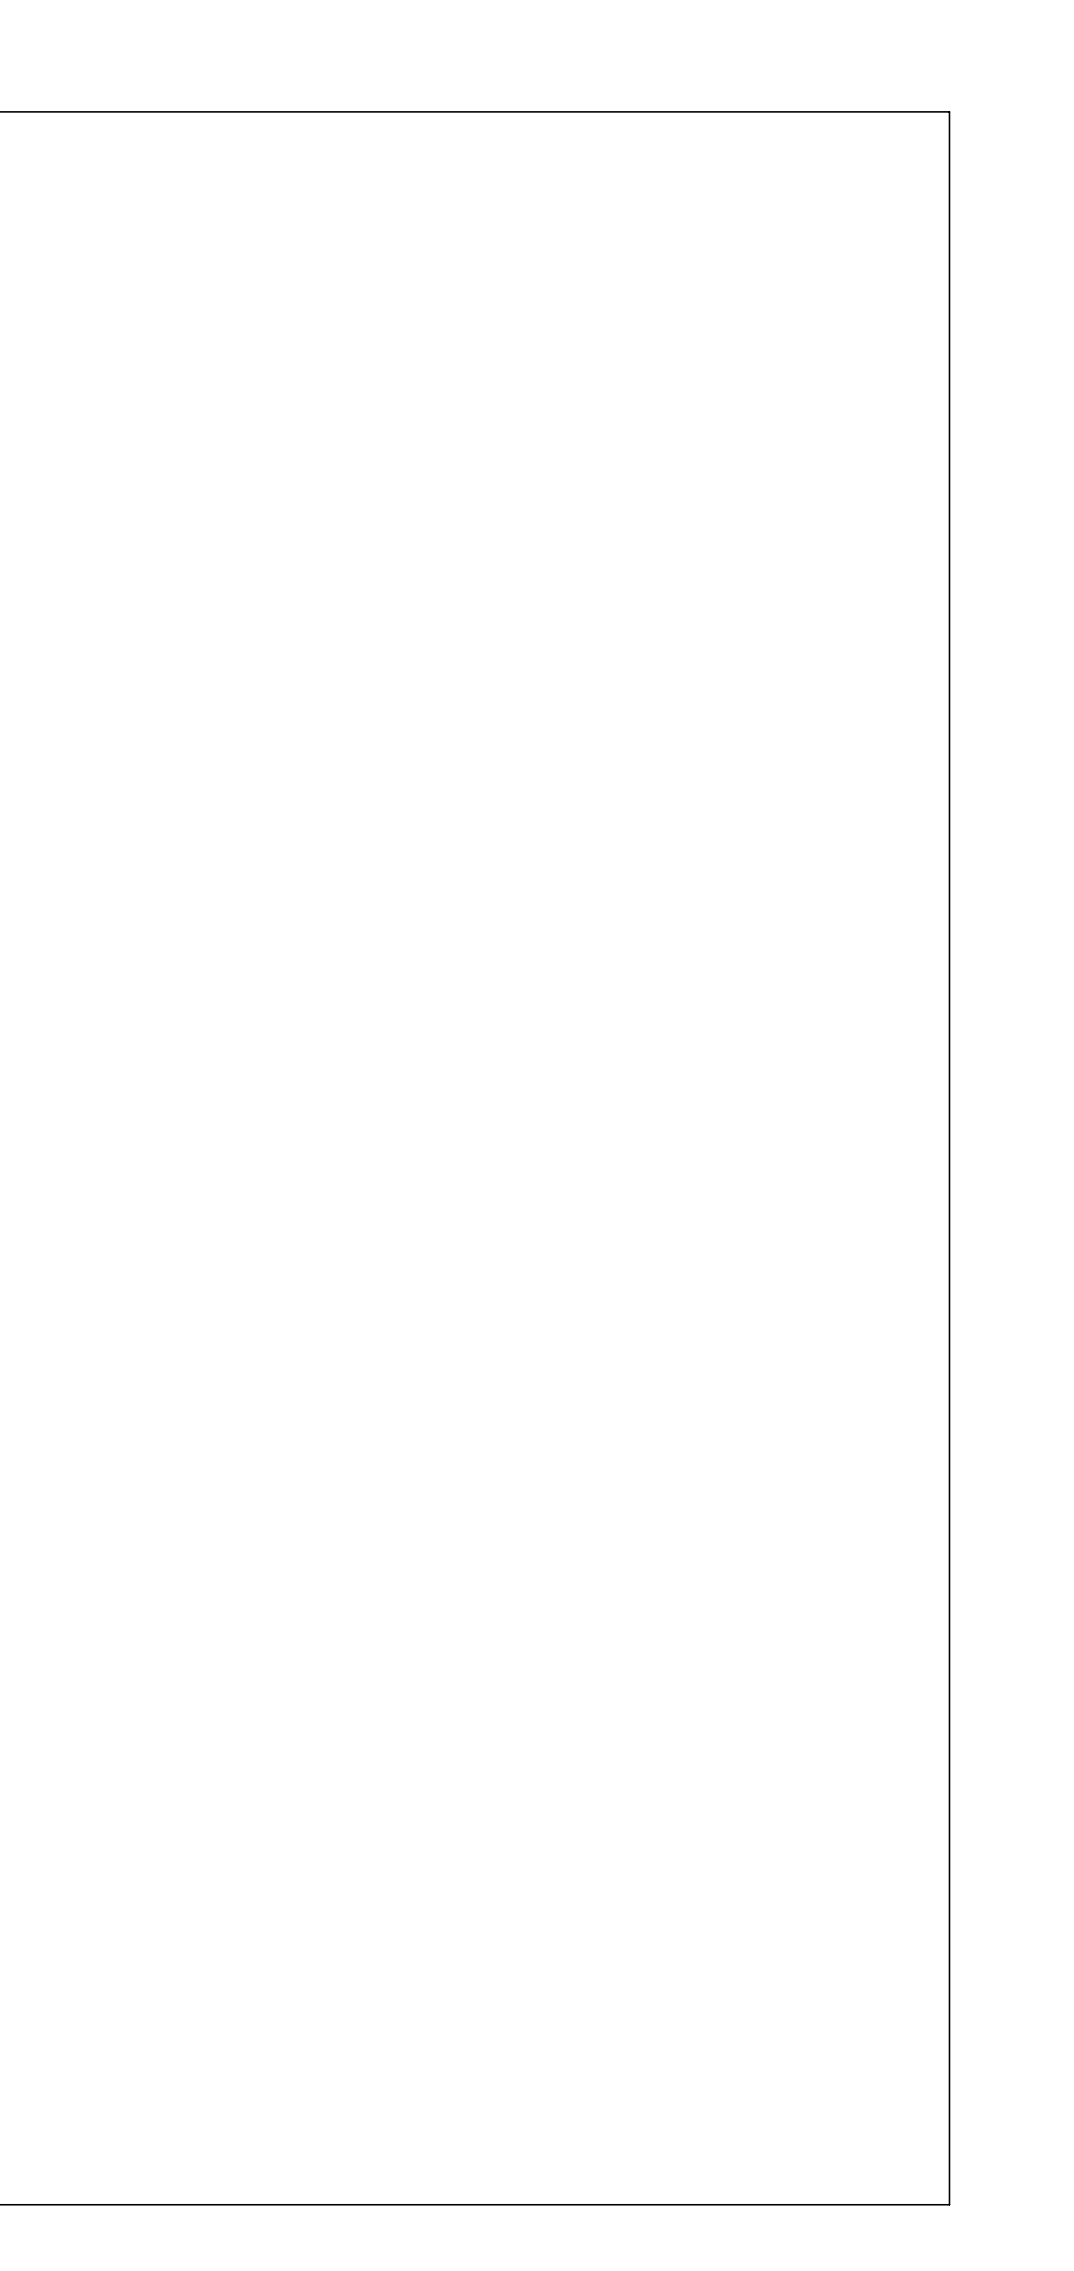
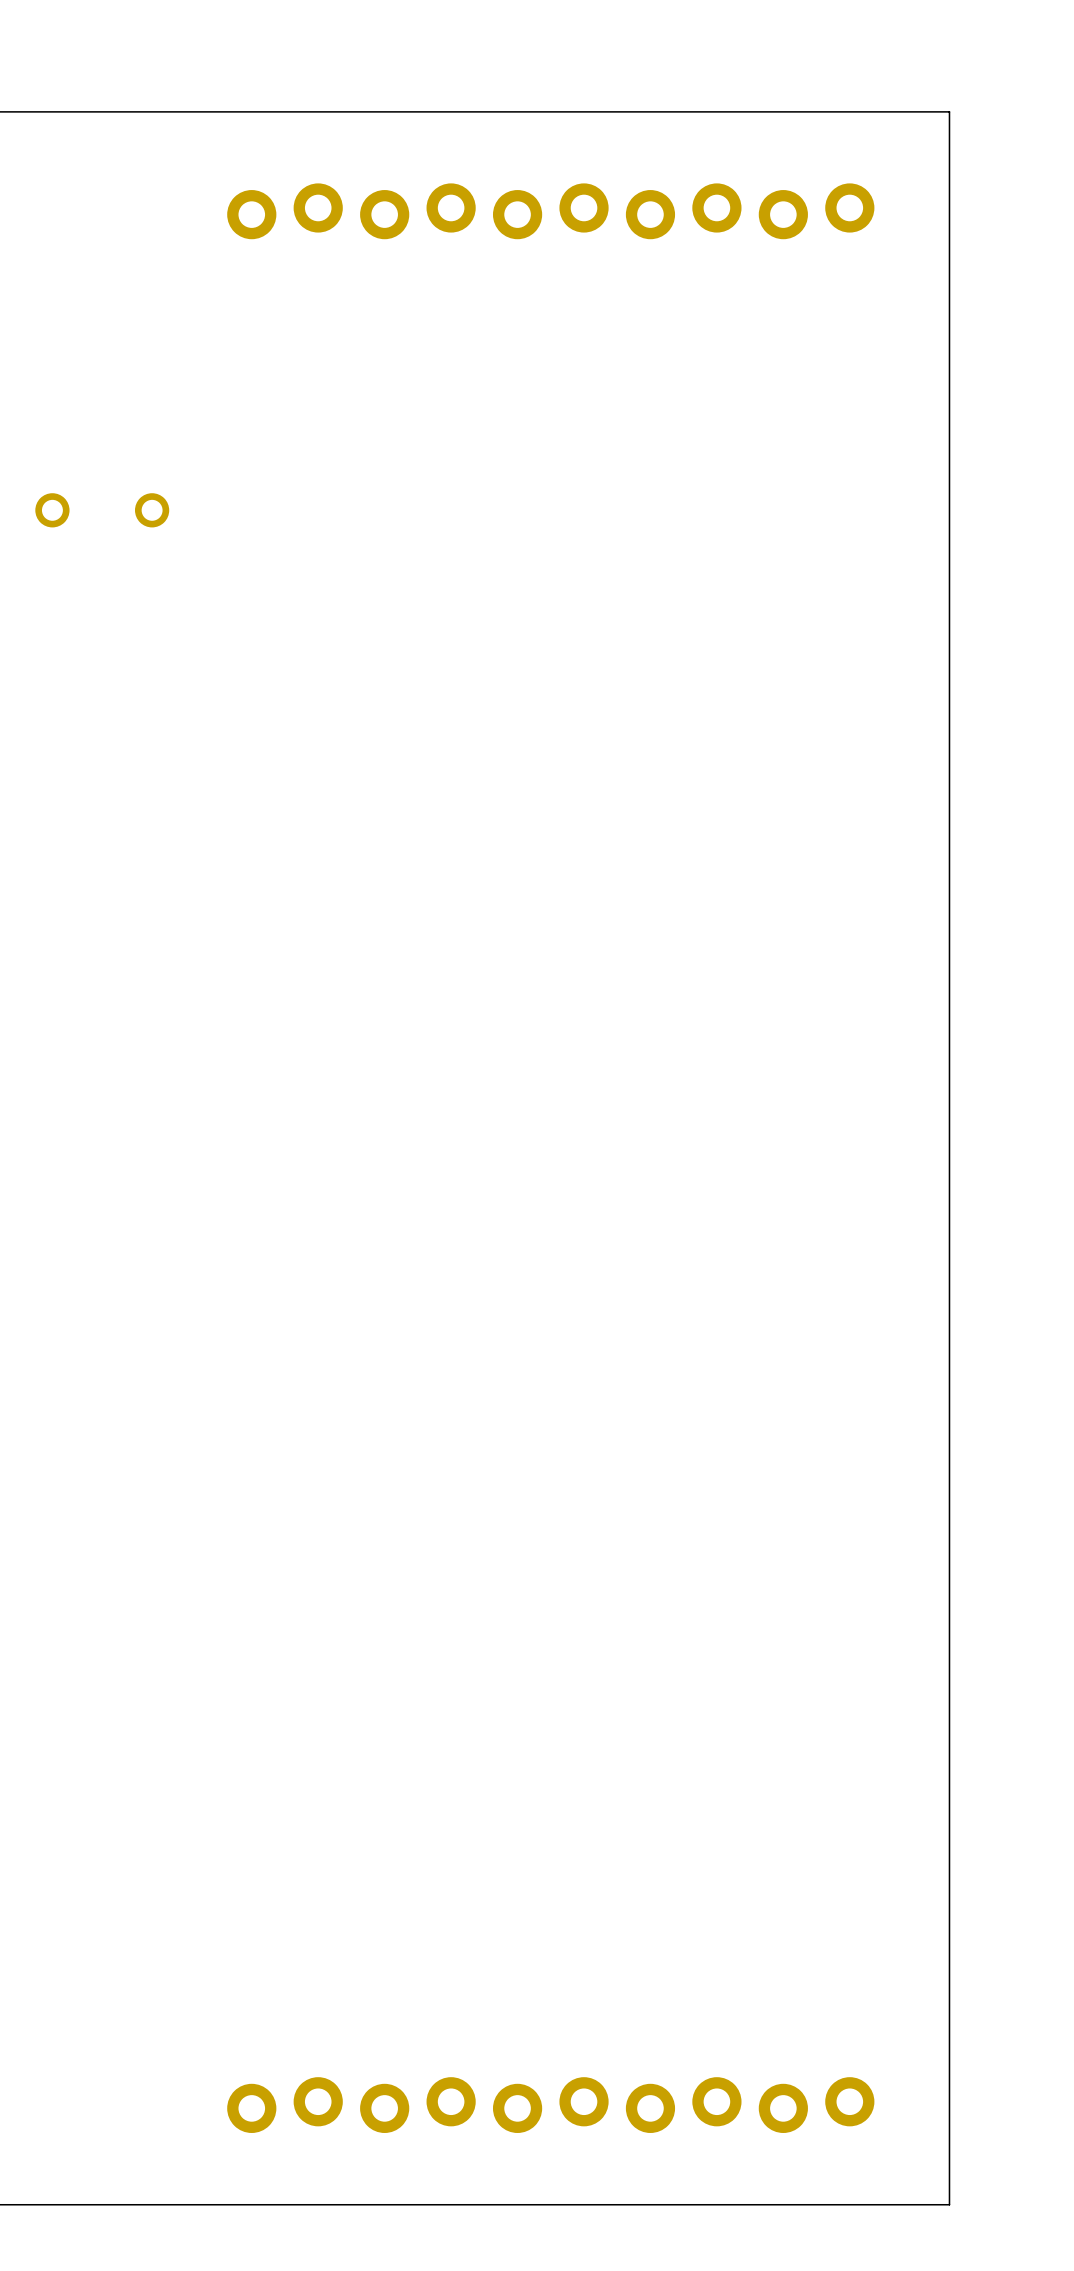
part: none -> (550, 211)
part: none -> (52, 510)
part: none -> (152, 510)
part: none -> (550, 2105)

